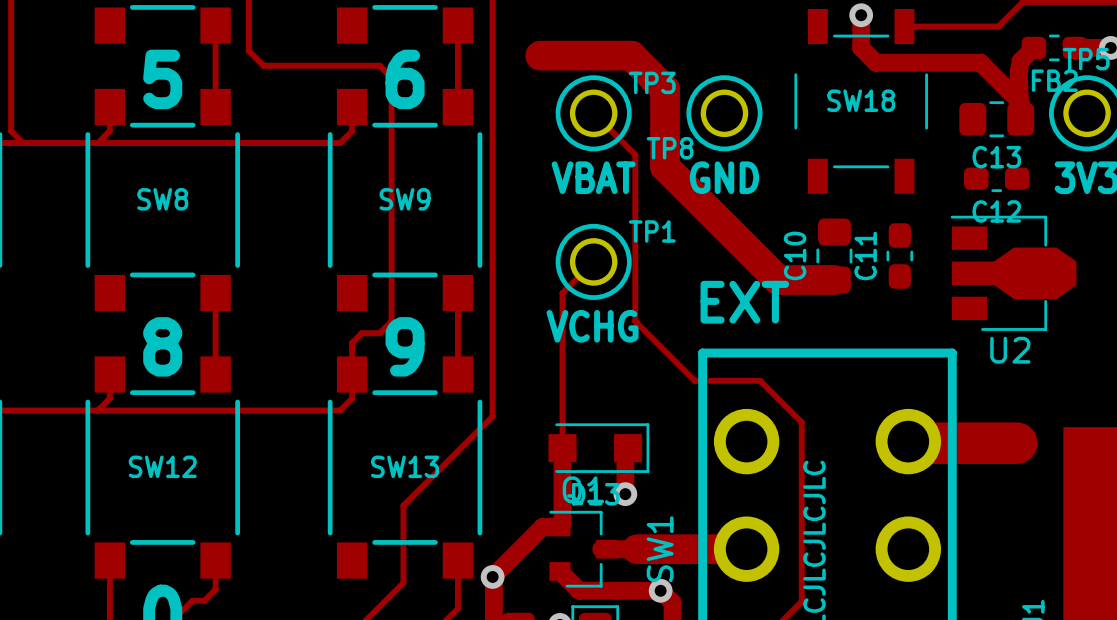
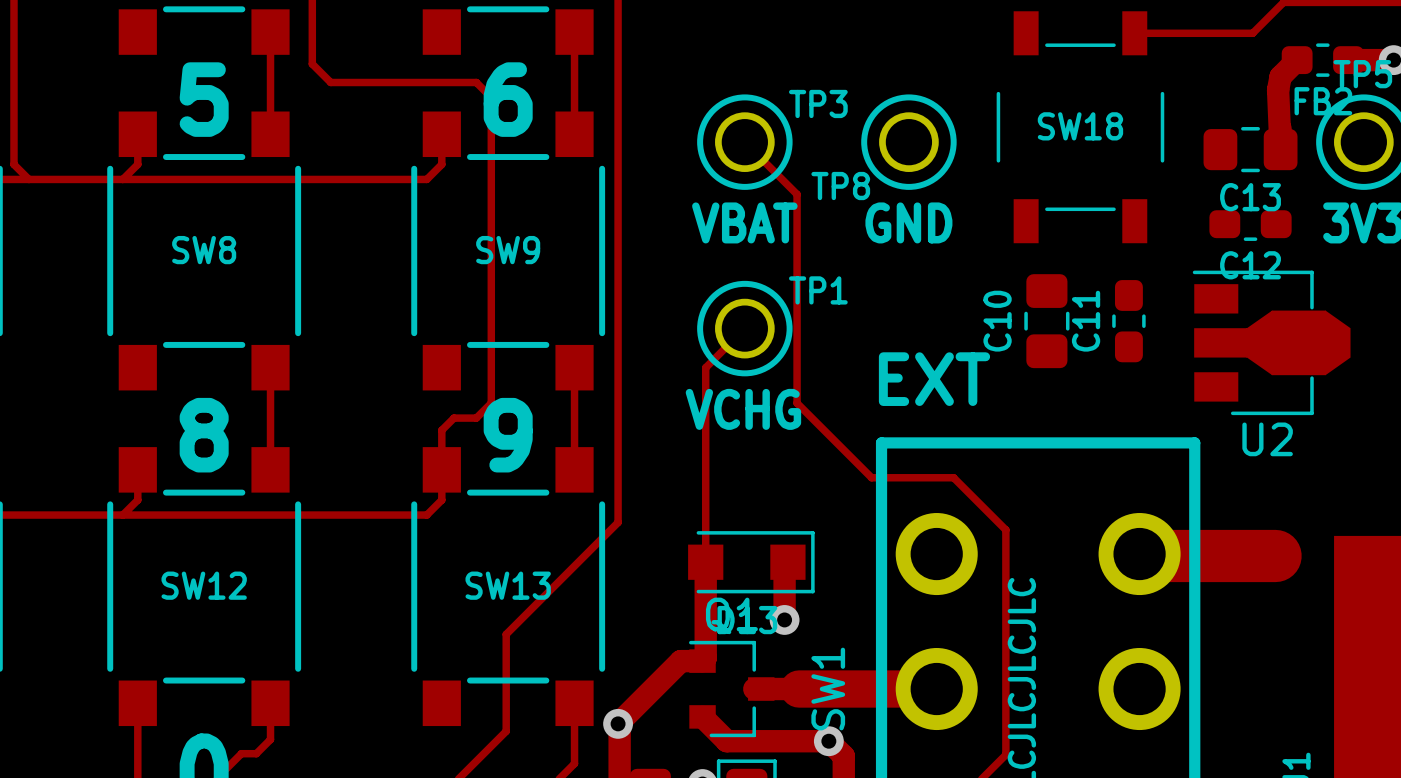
track: (861, 15) (861, 47) (876, 62) (980, 62) (1020, 102) -> none
via: (861, 15) -> none
track: (540, 55) (631, 55) (665, 89) (665, 166) (778, 279) (834, 279) -> none

